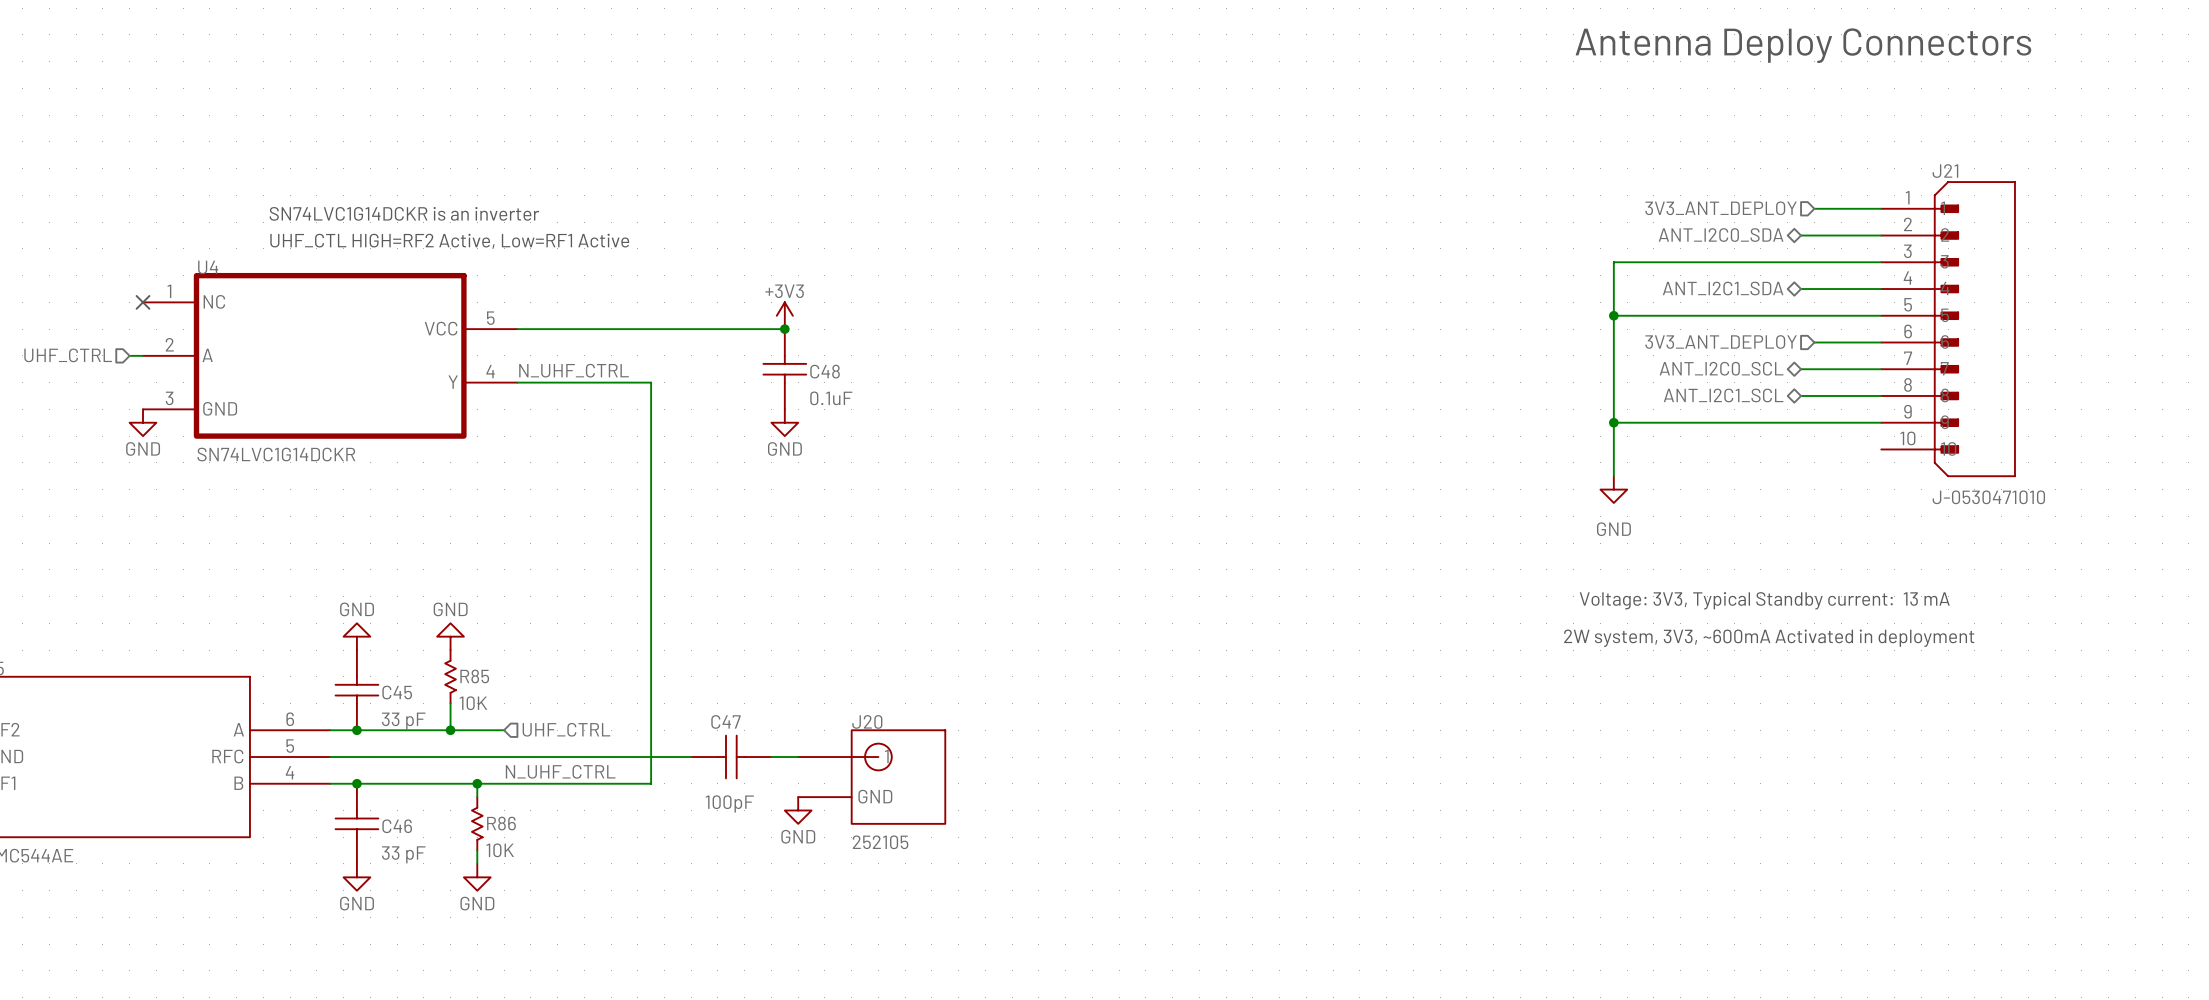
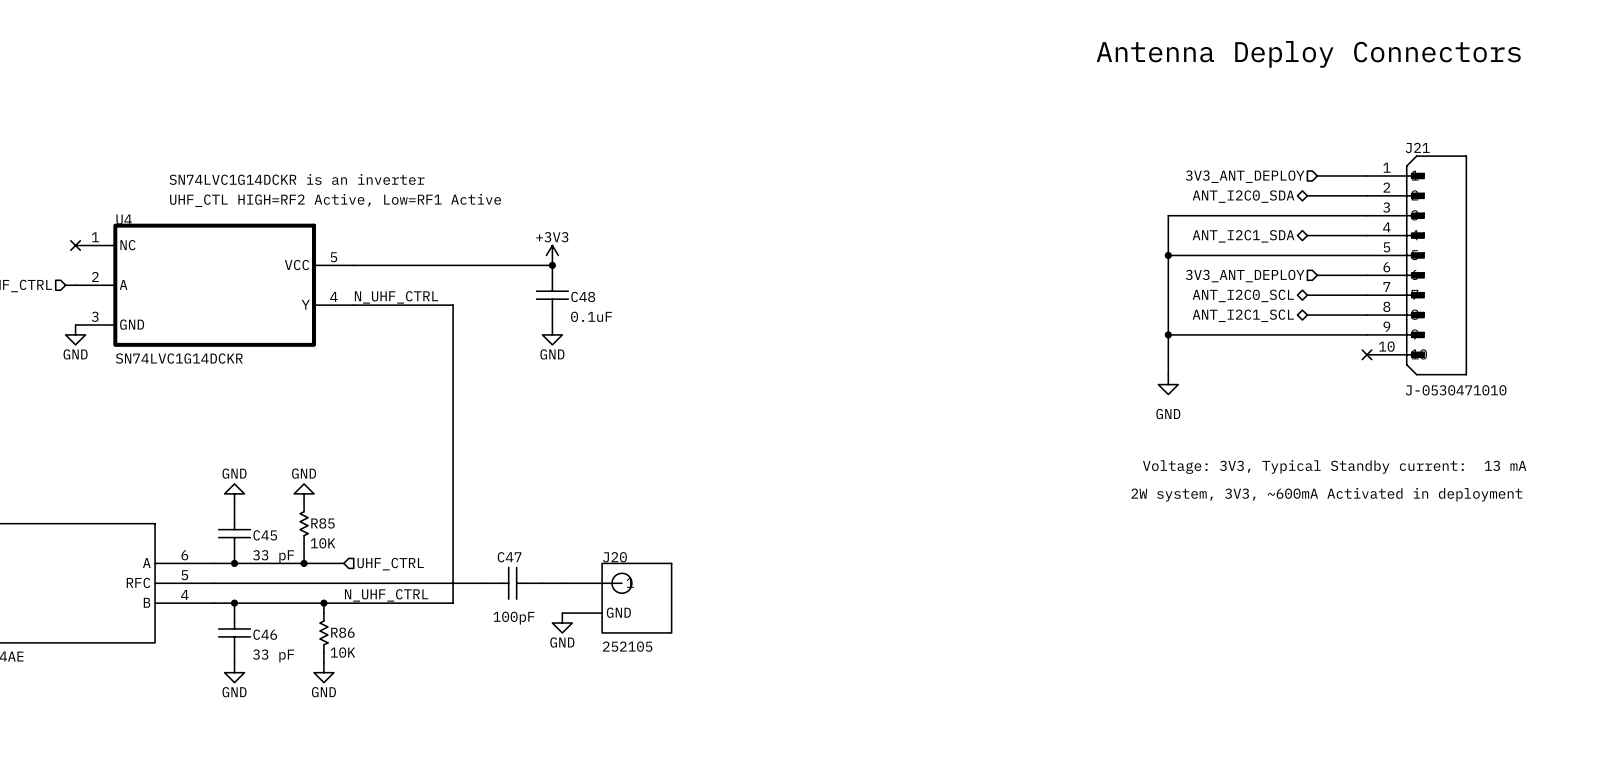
no-connect mark: none -> (1367, 354)

